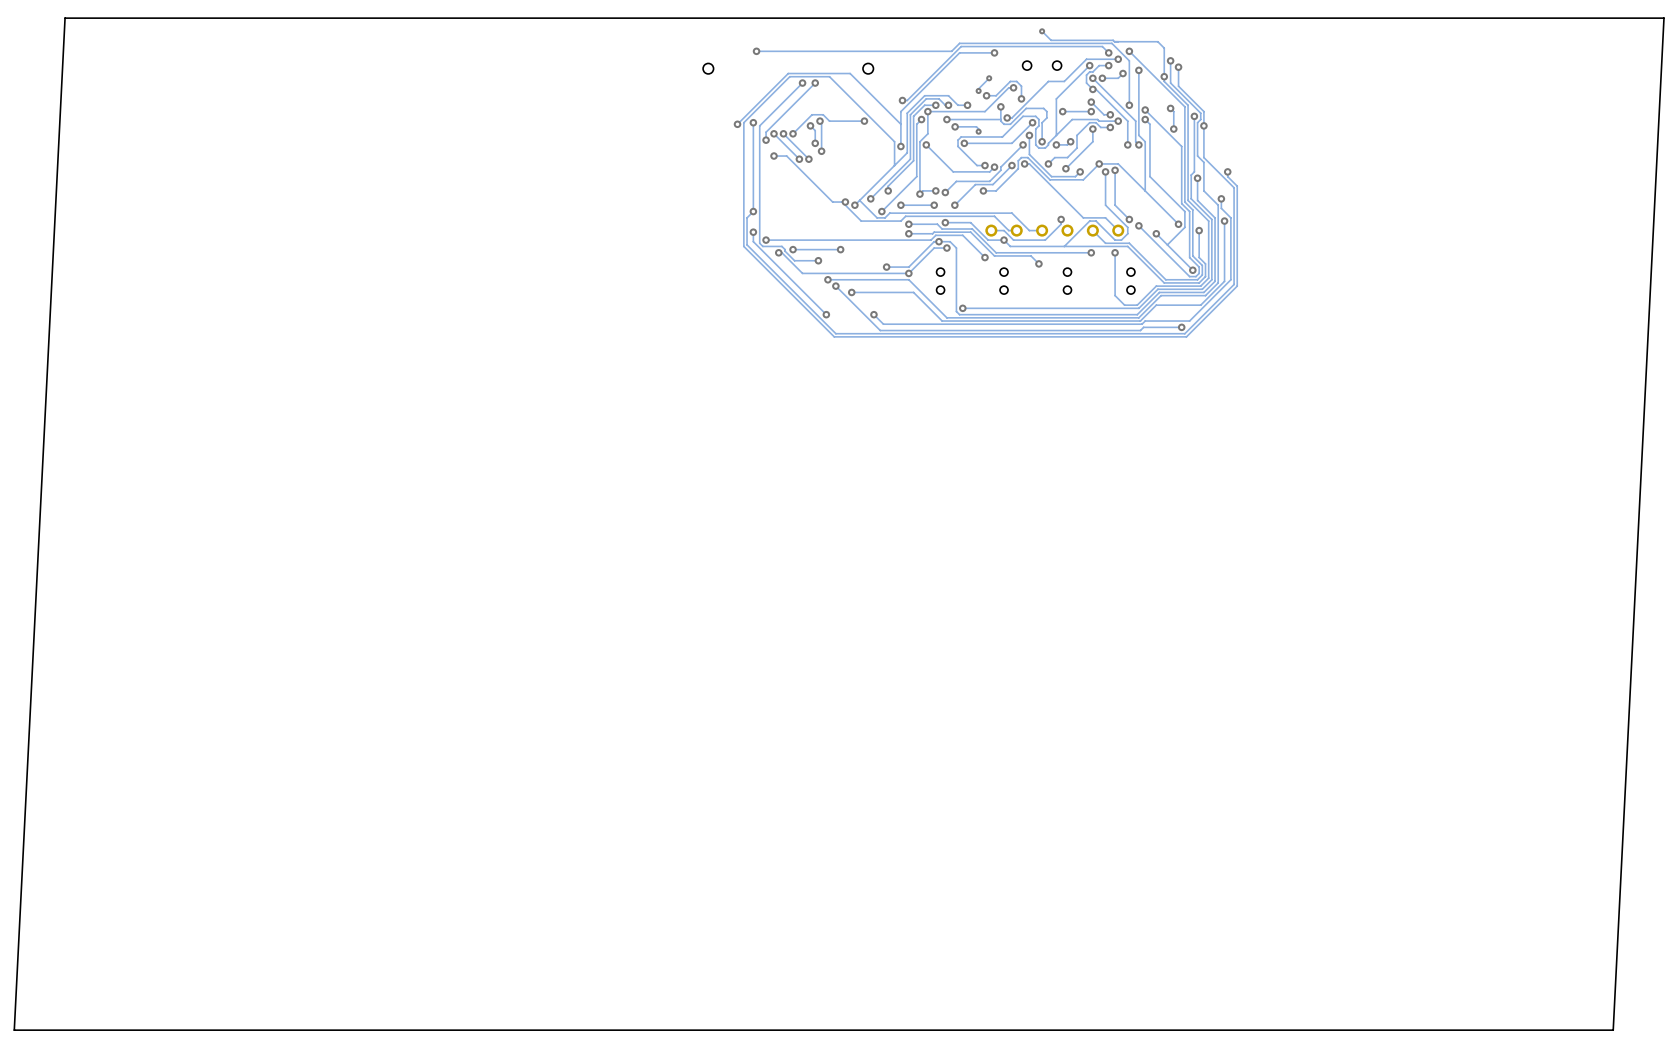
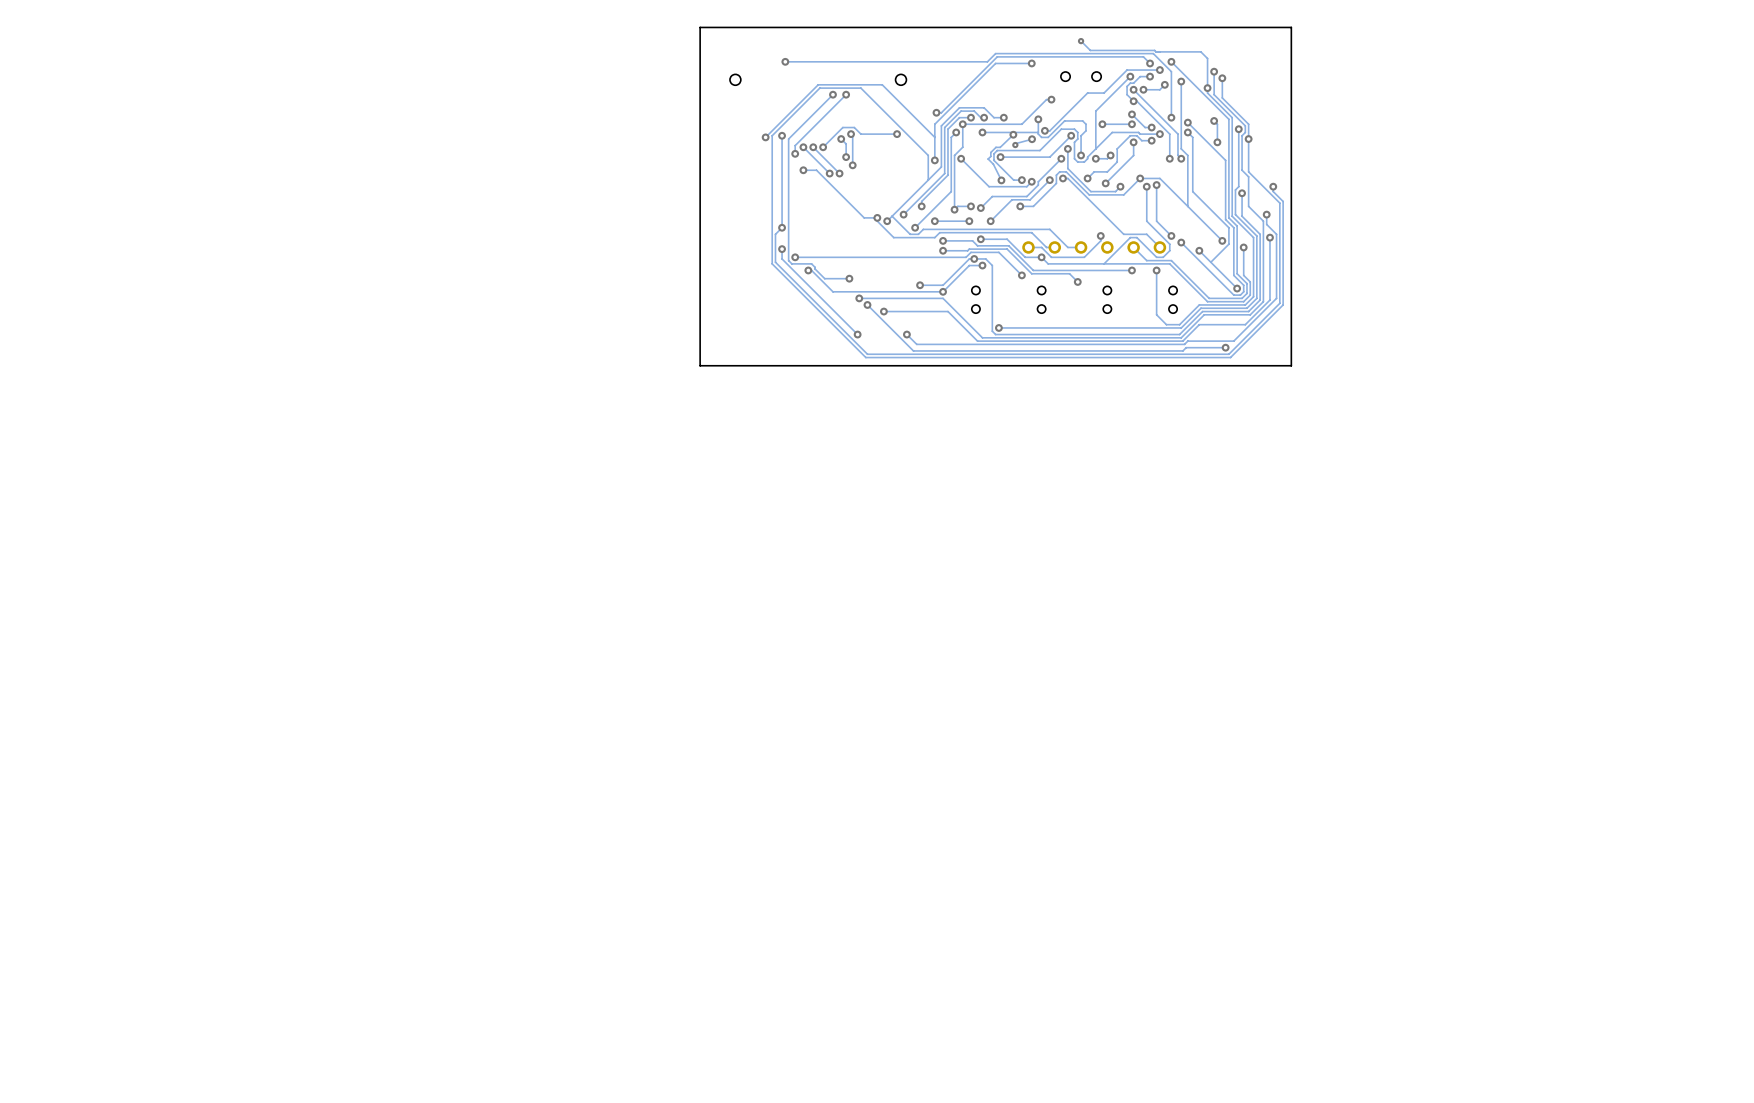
board edge: (1245, 18) (1663, 18) (1613, 1030) (14, 1030) (65, 18) (674, 18) -> (1291, 27) (1291, 365) (700, 365) (700, 27)
track: (989, 78) (978, 90) -> none
via: (989, 78) -> none
via: (978, 90) -> none
track: (986, 95) (996, 95) (1010, 81) (1016, 81) (1021, 86) (1021, 98) -> none
via: (986, 95) -> none
via: (1021, 98) -> none
track: none -> (1013, 134) (1000, 147) (995, 147) (988, 159) (993, 164) (1001, 180)
via: none -> (1013, 134)
track: (955, 126) (976, 126) (978, 131) -> none
via: (955, 126) -> none
track: none -> (1032, 139) (1013, 144)
via: none -> (1032, 139)
via: none -> (1001, 180)
via: (793, 249) -> none
track: (840, 249) (793, 249) -> none
via: (840, 249) -> none

